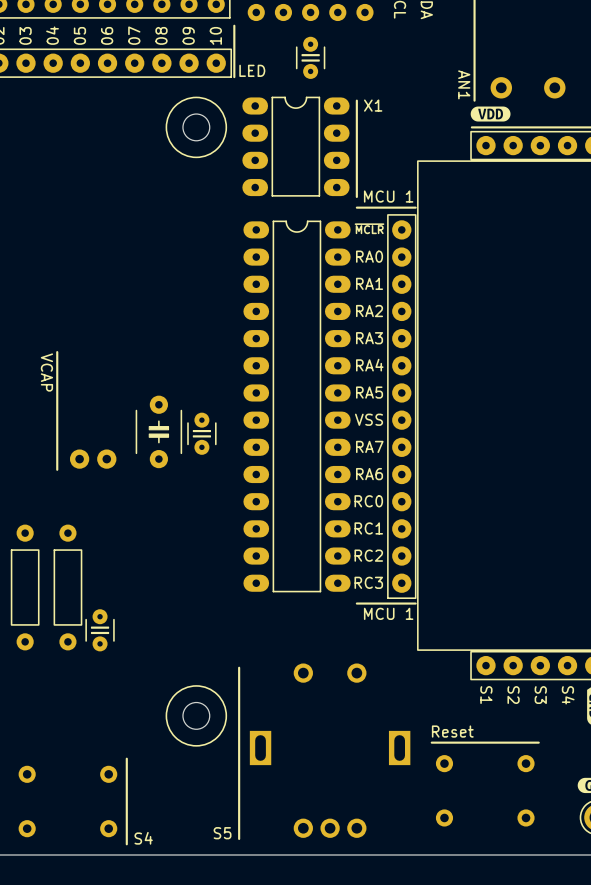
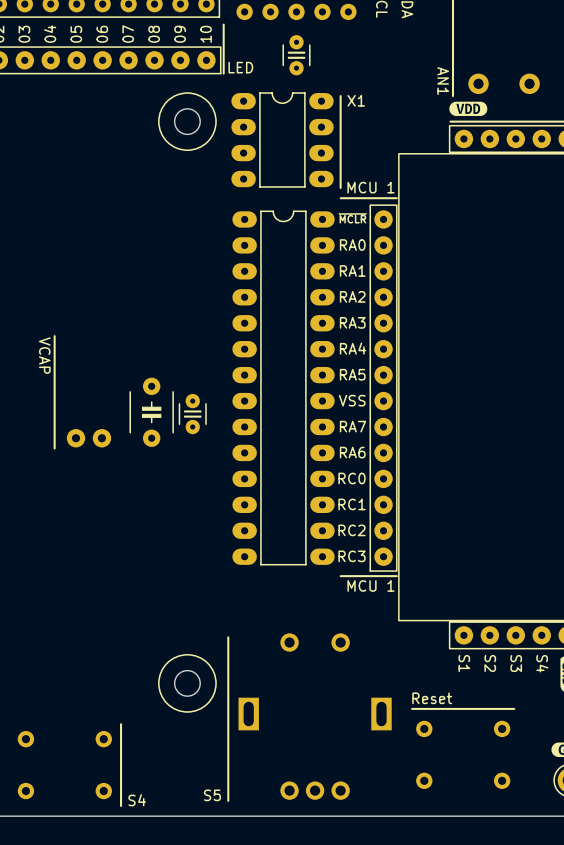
part: (25, 587) -> none
part: (67, 587) -> none
part: (100, 630) -> none

